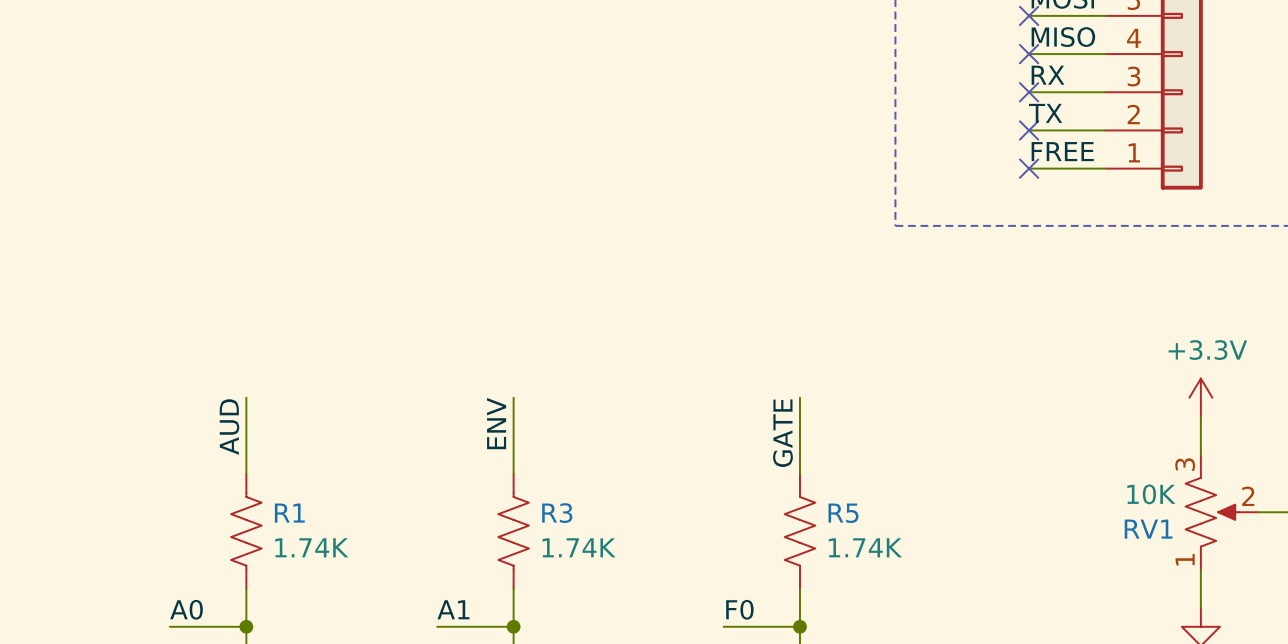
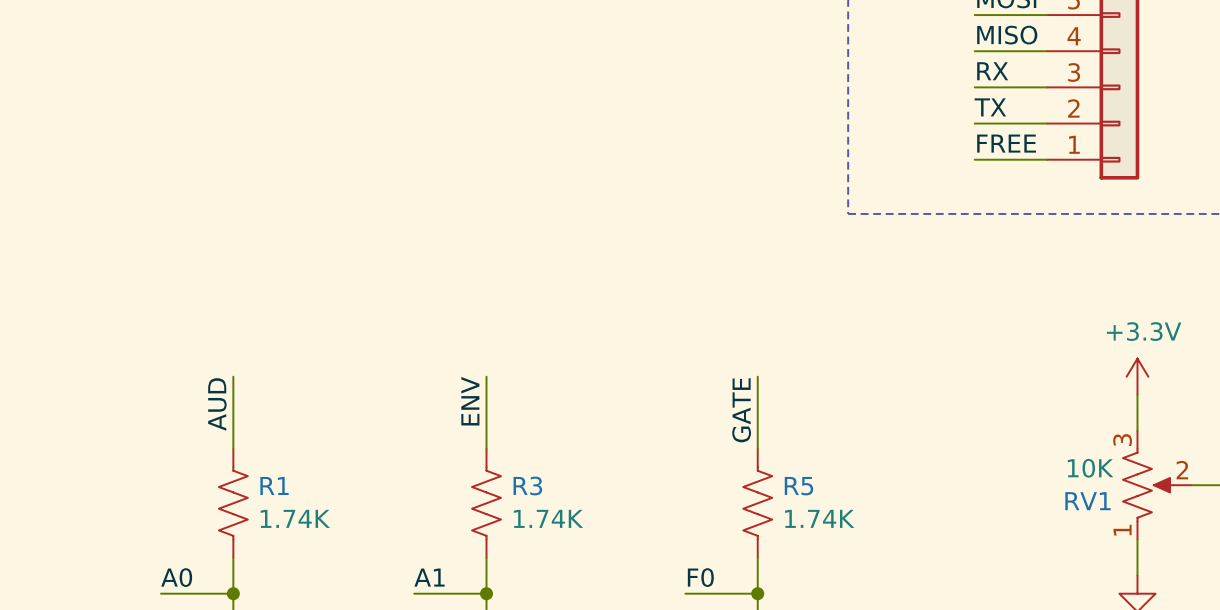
no-connect mark: (1029, 15) -> none
no-connect mark: (1029, 54) -> none
no-connect mark: (1029, 92) -> none
no-connect mark: (1029, 130) -> none
no-connect mark: (1029, 168) -> none

